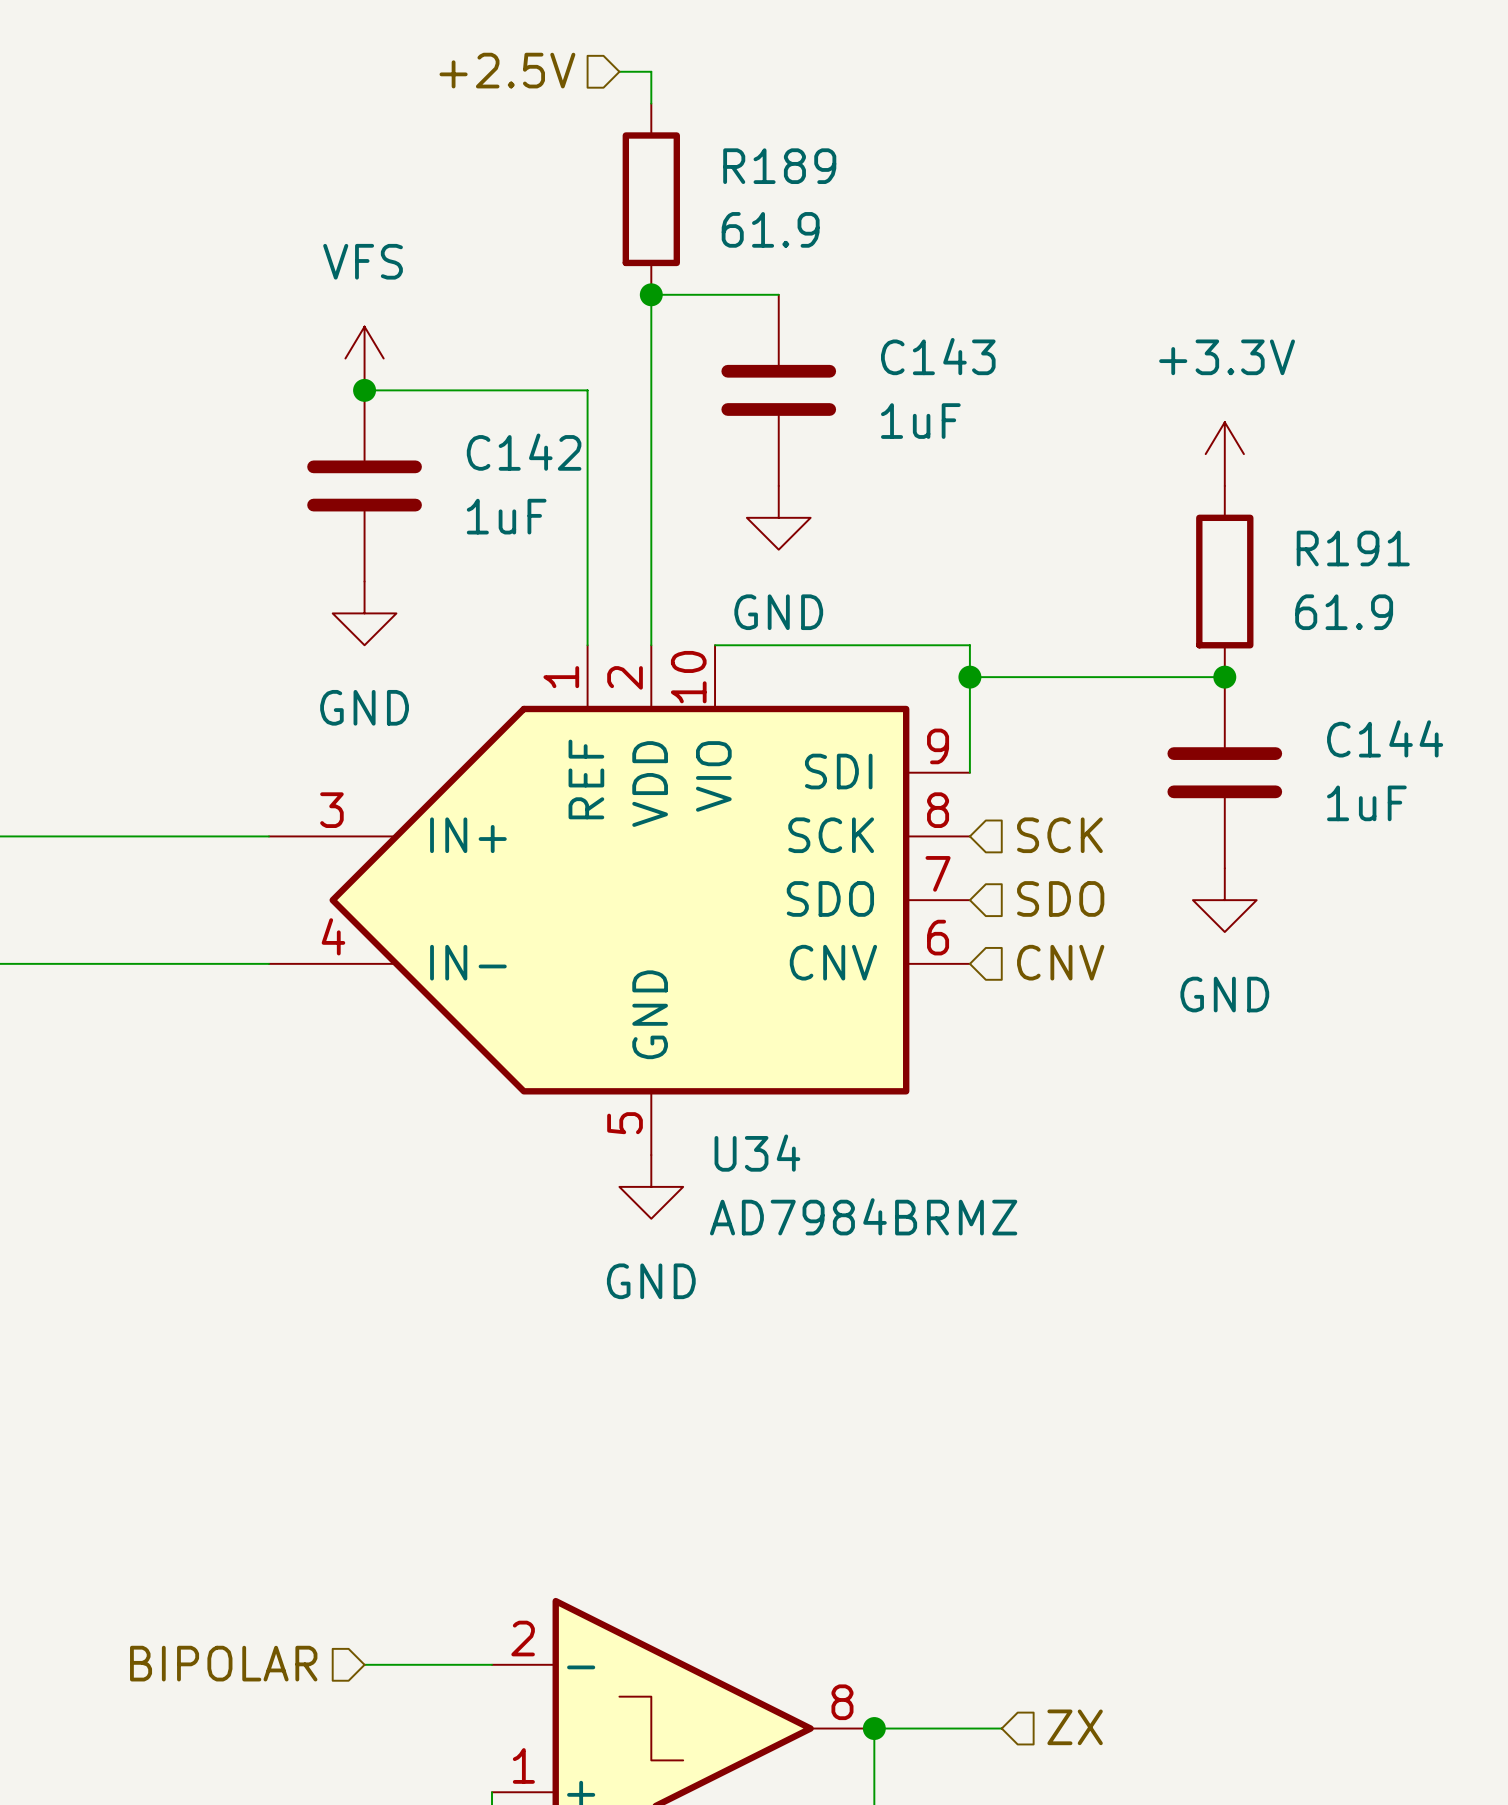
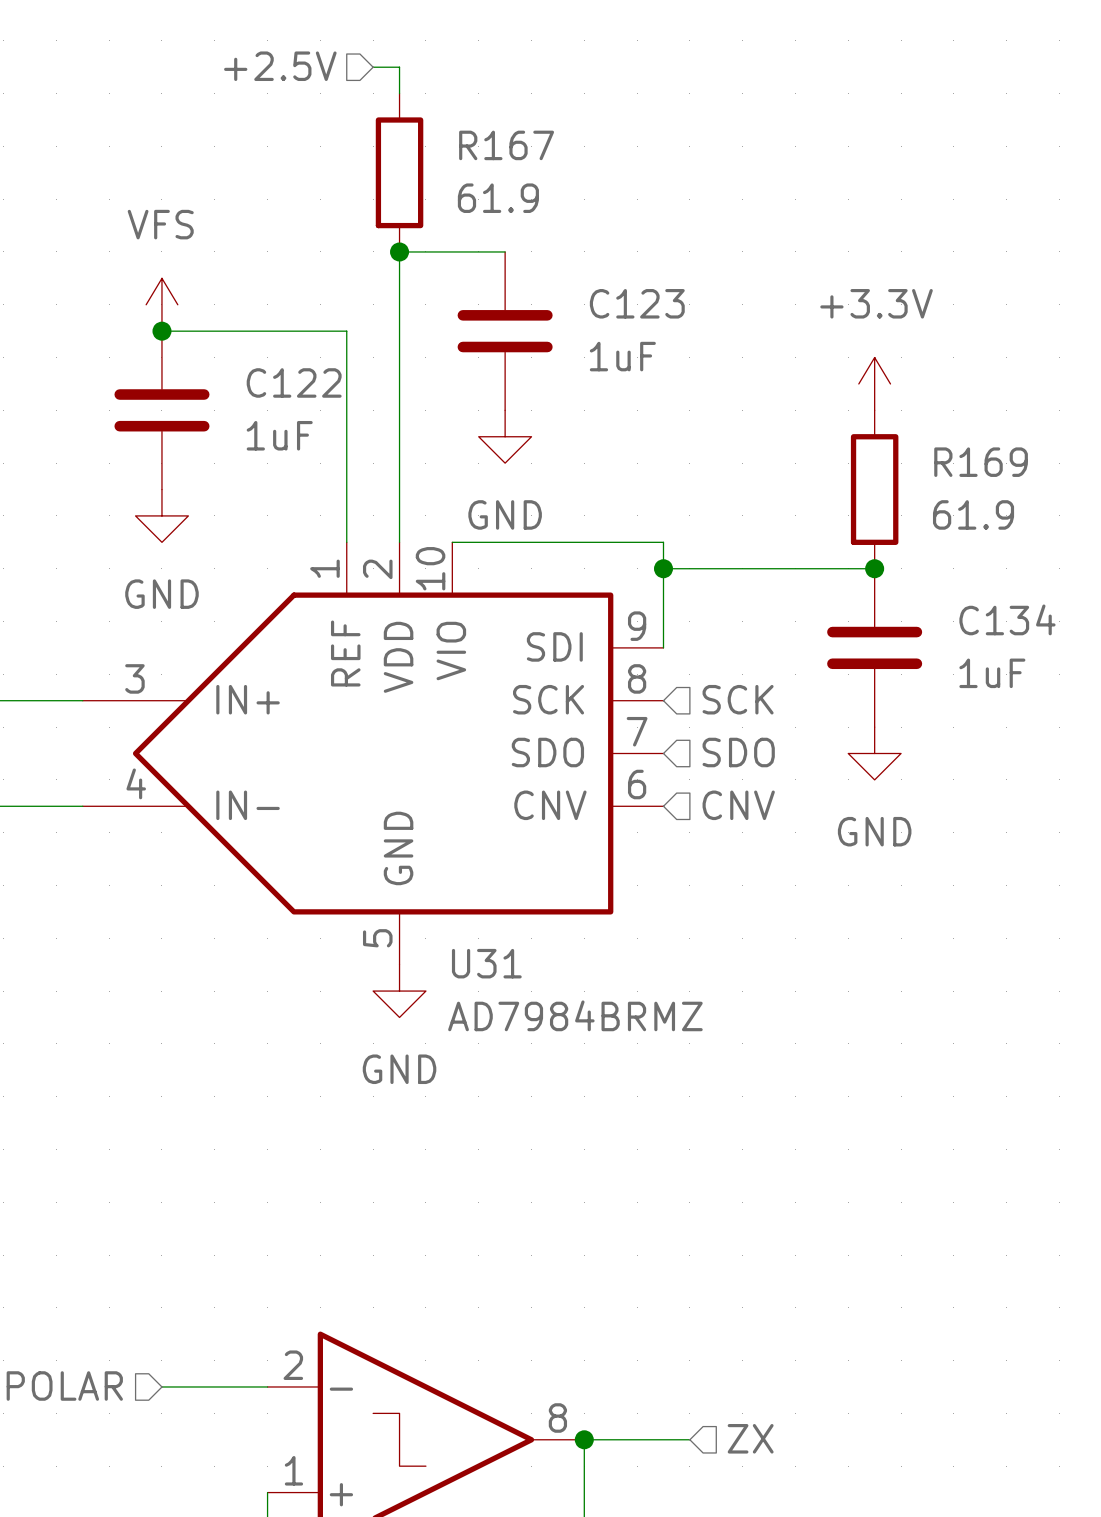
R189 name: R189 (779, 166) -> R167 (506, 145)
C143 name: C143 (938, 356) -> C123 (637, 303)
C142 name: C142 (524, 452) -> C122 (294, 382)
R191 name: R191 (1353, 548) -> R169 (981, 462)
C144 name: C144 (1385, 738) -> C134 (1007, 619)
U34 name: U34 (757, 1153) -> U31 (486, 963)

